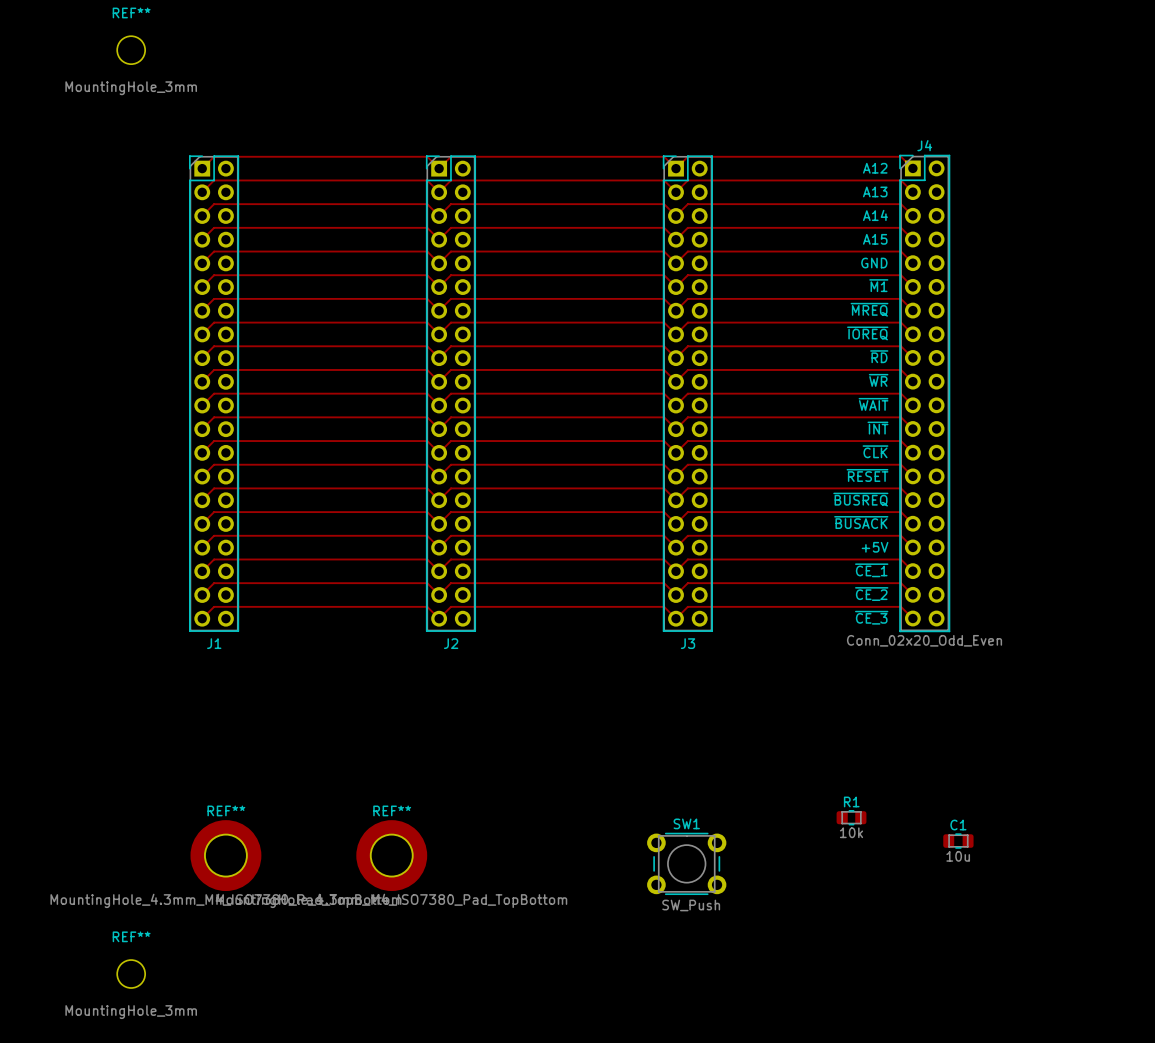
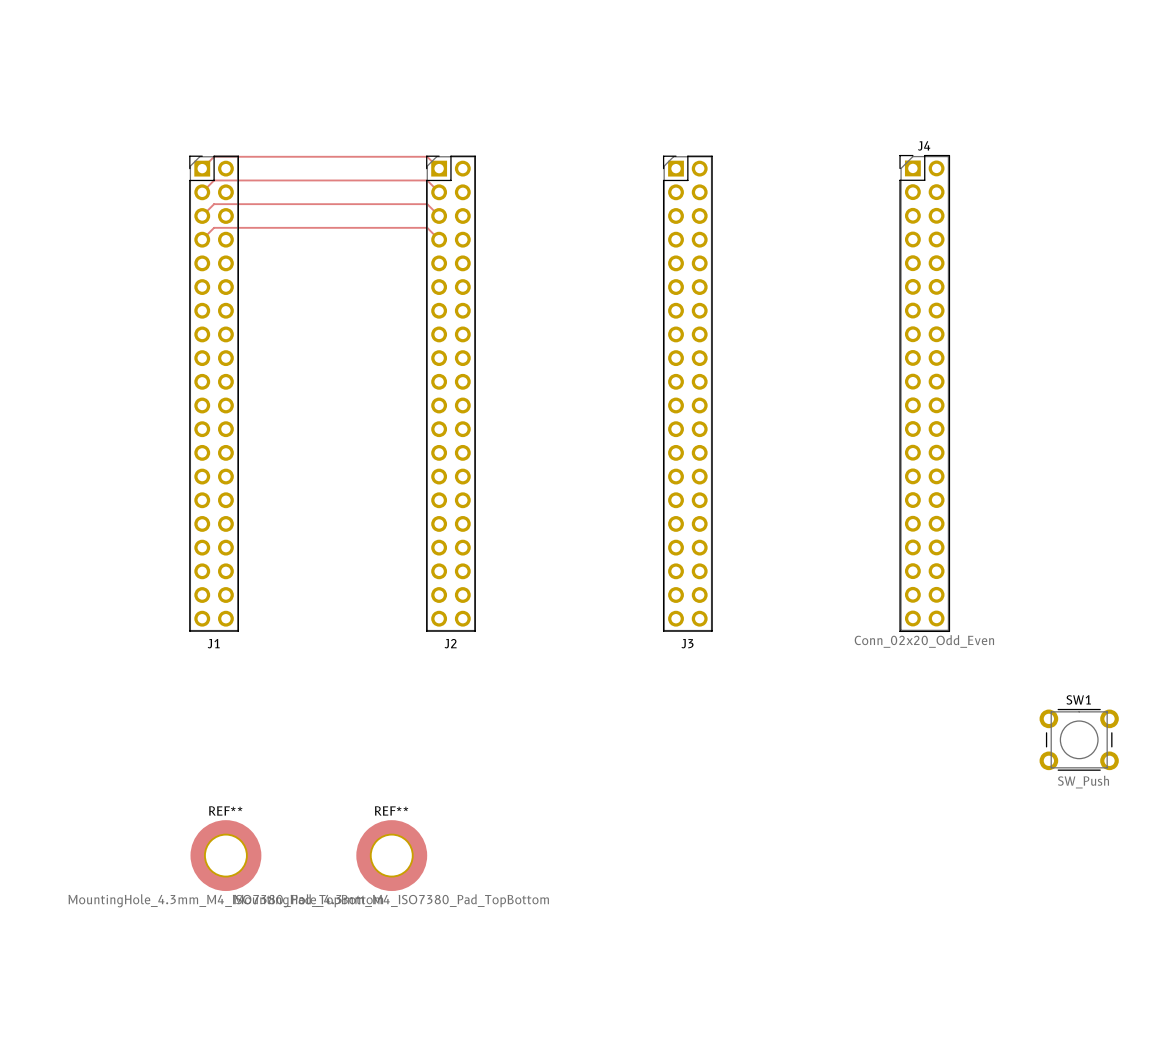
REF**: MountingHole_3mm (131, 50) -> none
track: (439, 168) (450, 156) (664, 156) (676, 168) (687, 156) (901, 156) (912, 168) -> none
text: A12 (875, 168) -> none
text: A13 (875, 191) -> none
track: (439, 192) (450, 180) (664, 180) (676, 192) (687, 180) (901, 180) (912, 192) -> none
track: (439, 215) (450, 204) (664, 204) (676, 215) (687, 204) (901, 204) (912, 215) -> none
text: A14 (875, 215) -> none
track: (439, 239) (450, 227) (664, 227) (676, 239) (687, 227) (901, 227) (912, 239) -> none
text: A15 (875, 239) -> none
track: (202, 263) (214, 251) (427, 251) (439, 263) (450, 251) (664, 251) (676, 263) (687, 251) (901, 251) (912, 263) -> none
text: GND (874, 263) -> none
text: ~{M1} (878, 285) -> none
track: (202, 287) (214, 275) (427, 275) (439, 287) (450, 275) (664, 275) (676, 287) (687, 275) (901, 275) (912, 287) -> none
text: ~{MREQ} (869, 309) -> none
track: (202, 310) (214, 298) (427, 298) (439, 310) (450, 298) (664, 298) (676, 310) (687, 298) (901, 298) (912, 310) -> none
text: ~{IOREQ} (867, 333) -> none
track: (202, 334) (214, 322) (427, 322) (439, 334) (450, 322) (664, 322) (676, 334) (687, 322) (901, 322) (912, 334) -> none
text: ~{RD} (879, 356) -> none
track: (202, 358) (214, 346) (427, 346) (439, 358) (450, 346) (664, 346) (676, 358) (687, 346) (901, 346) (912, 358) -> none
text: ~{WR} (878, 380) -> none
track: (202, 381) (214, 369) (427, 369) (439, 381) (450, 369) (664, 369) (676, 381) (687, 369) (901, 369) (912, 381) -> none
text: ~{WAIT} (873, 404) -> none
track: (202, 405) (214, 393) (427, 393) (439, 405) (450, 393) (664, 393) (676, 405) (687, 393) (901, 393) (912, 405) -> none
text: ~{INT} (877, 428) -> none
track: (202, 429) (214, 417) (427, 417) (439, 429) (450, 417) (664, 417) (676, 429) (687, 417) (901, 417) (912, 429) -> none
text: ~{CLK} (875, 451) -> none
track: (202, 452) (214, 441) (427, 441) (439, 452) (450, 441) (664, 441) (676, 452) (687, 441) (901, 441) (912, 452) -> none
text: ~{RESET} (867, 475) -> none
track: (202, 476) (214, 464) (427, 464) (439, 476) (450, 464) (664, 464) (676, 476) (687, 464) (901, 464) (912, 476) -> none
text: ~{BUSREQ} (860, 499) -> none
track: (202, 500) (214, 488) (427, 488) (439, 500) (450, 488) (664, 488) (676, 500) (687, 488) (901, 488) (912, 500) -> none
text: ~{BUSACK} (861, 522) -> none
track: (202, 523) (214, 512) (427, 512) (439, 523) (450, 512) (664, 512) (676, 523) (687, 512) (901, 512) (912, 523) -> none
track: (202, 547) (214, 535) (427, 535) (439, 547) (450, 535) (664, 535) (676, 547) (687, 535) (901, 535) (912, 547) -> none
text: +5V (875, 547) -> none
text: ~{CE_1} (871, 570) -> none
track: (202, 571) (214, 559) (427, 559) (439, 571) (450, 559) (664, 559) (676, 571) (687, 559) (901, 559) (912, 571) -> none
text: ~{CE_2} (871, 594) -> none
track: (202, 595) (214, 583) (427, 583) (439, 595) (450, 583) (664, 583) (676, 595) (687, 583) (901, 583) (912, 595) -> none
text: ~{CE_3} (871, 617) -> none
track: (202, 618) (214, 606) (427, 606) (439, 618) (450, 606) (664, 606) (676, 618) (687, 606) (901, 606) (912, 618) -> none
R1: 10k (851, 817) -> none
C1: 10u (958, 841) -> none
SW1 position: (686, 863) -> (1079, 739)
REF**: MountingHole_3mm (131, 974) -> none

